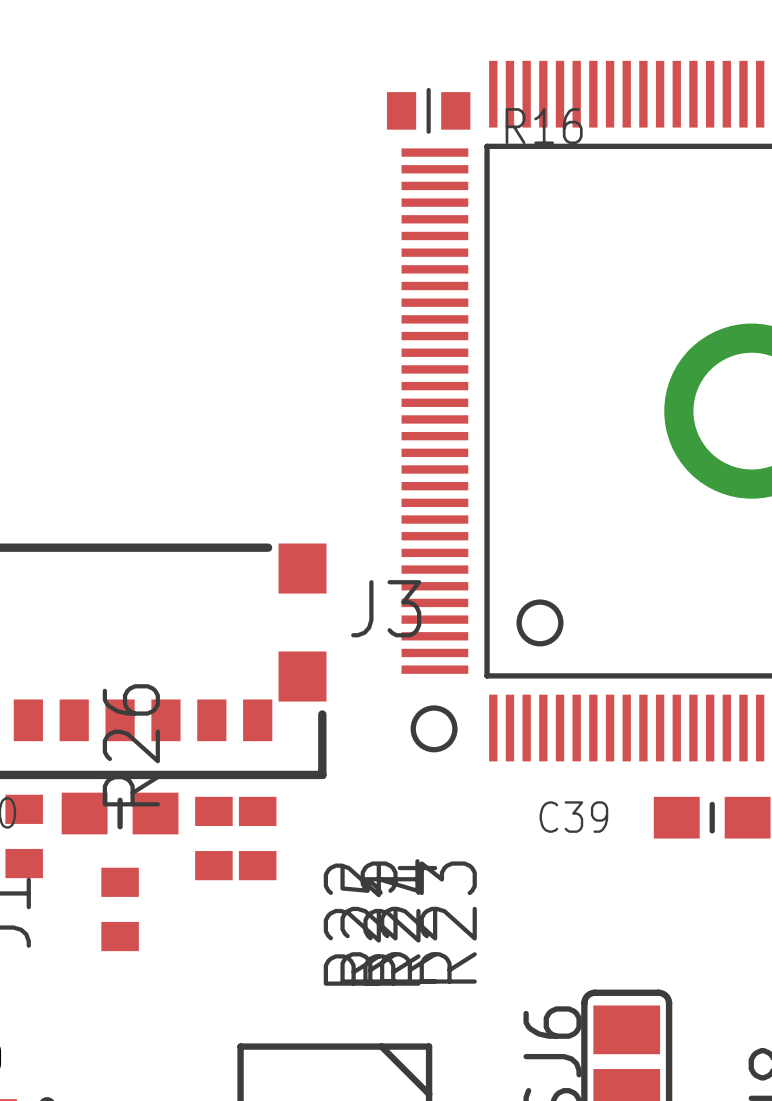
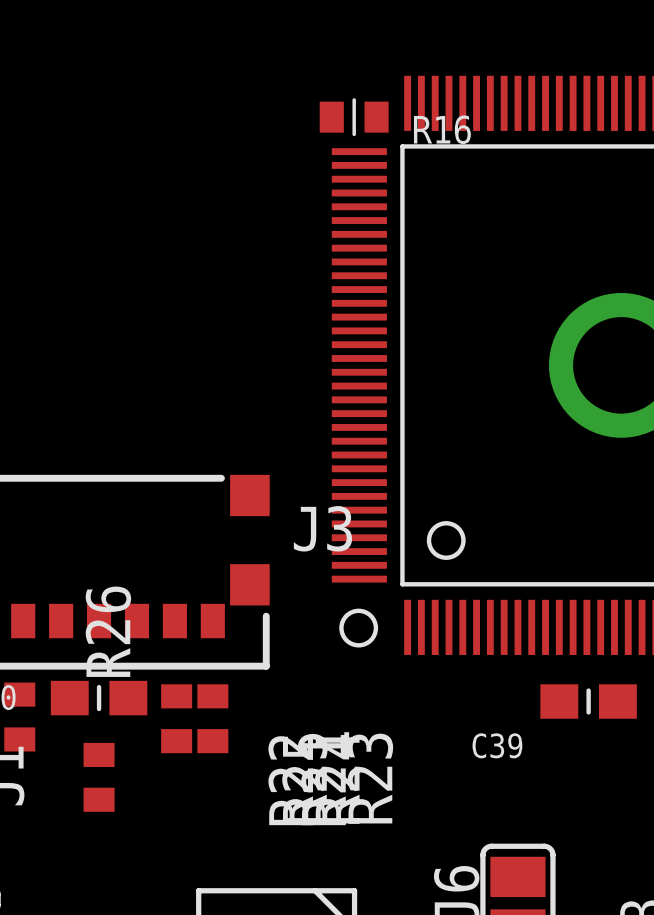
C39 name position: C39 (573, 817) -> C39 (497, 745)

